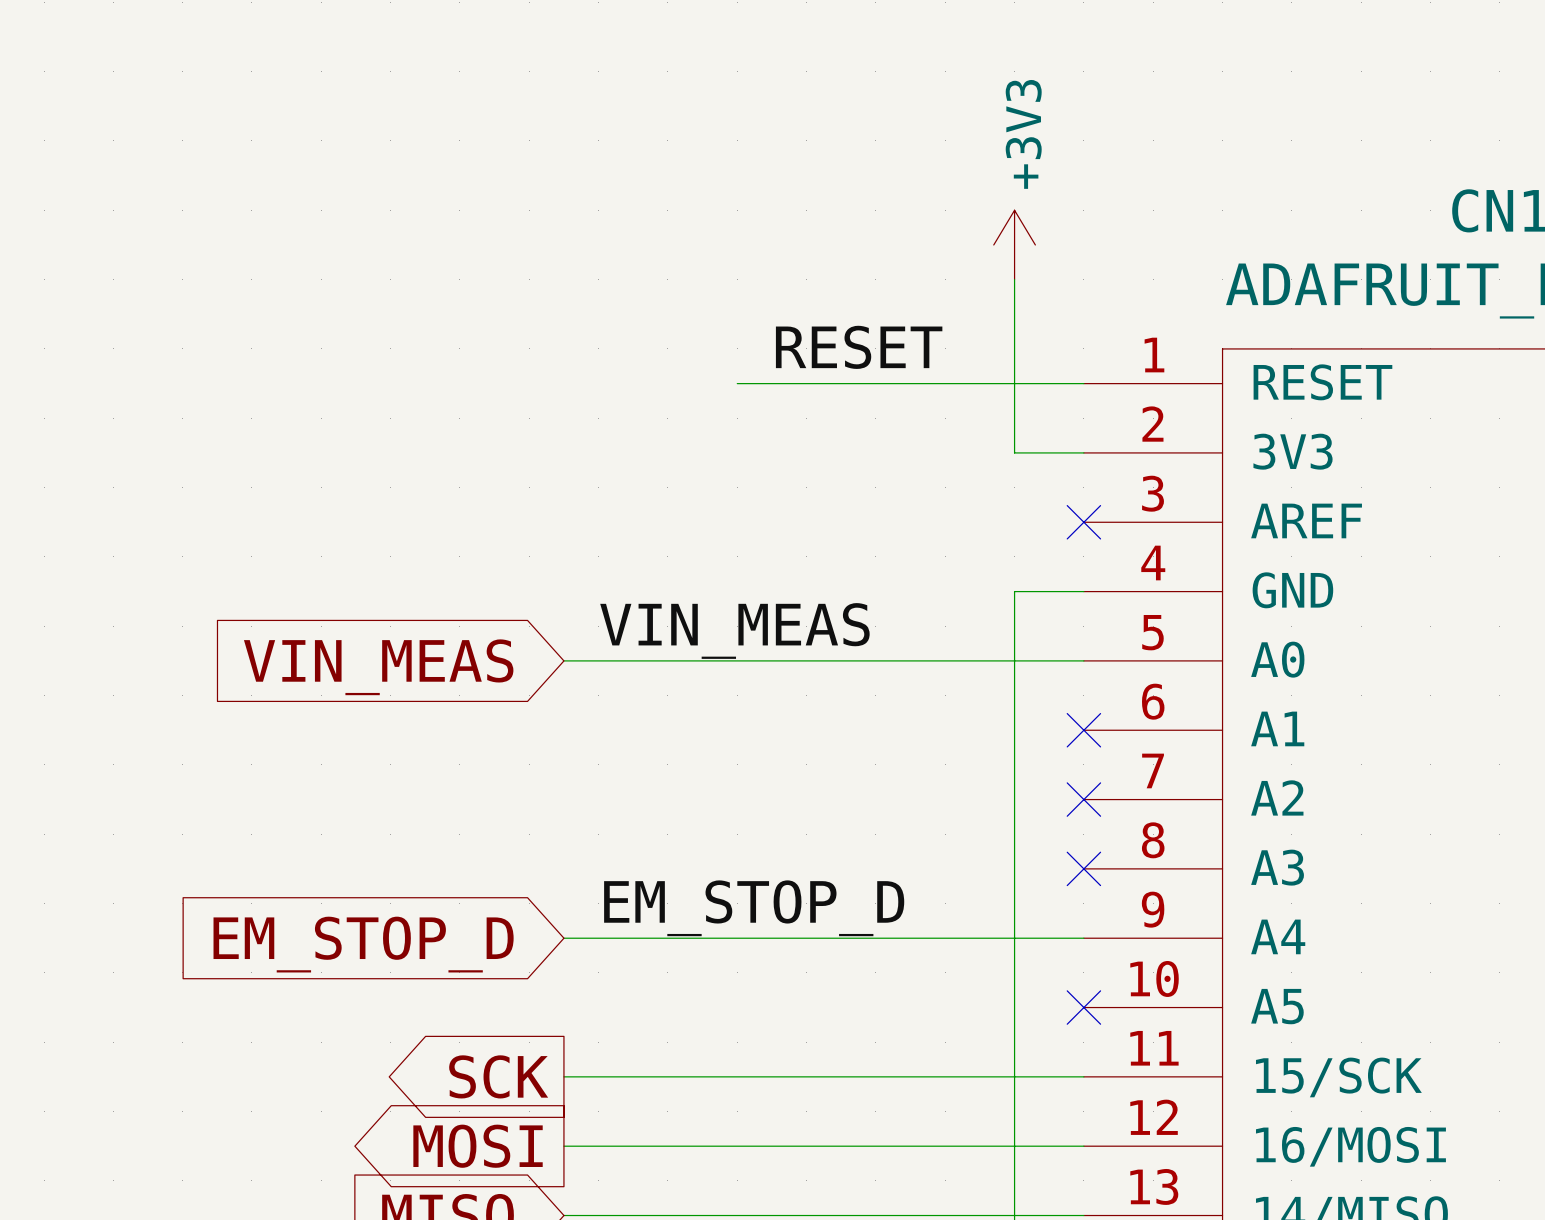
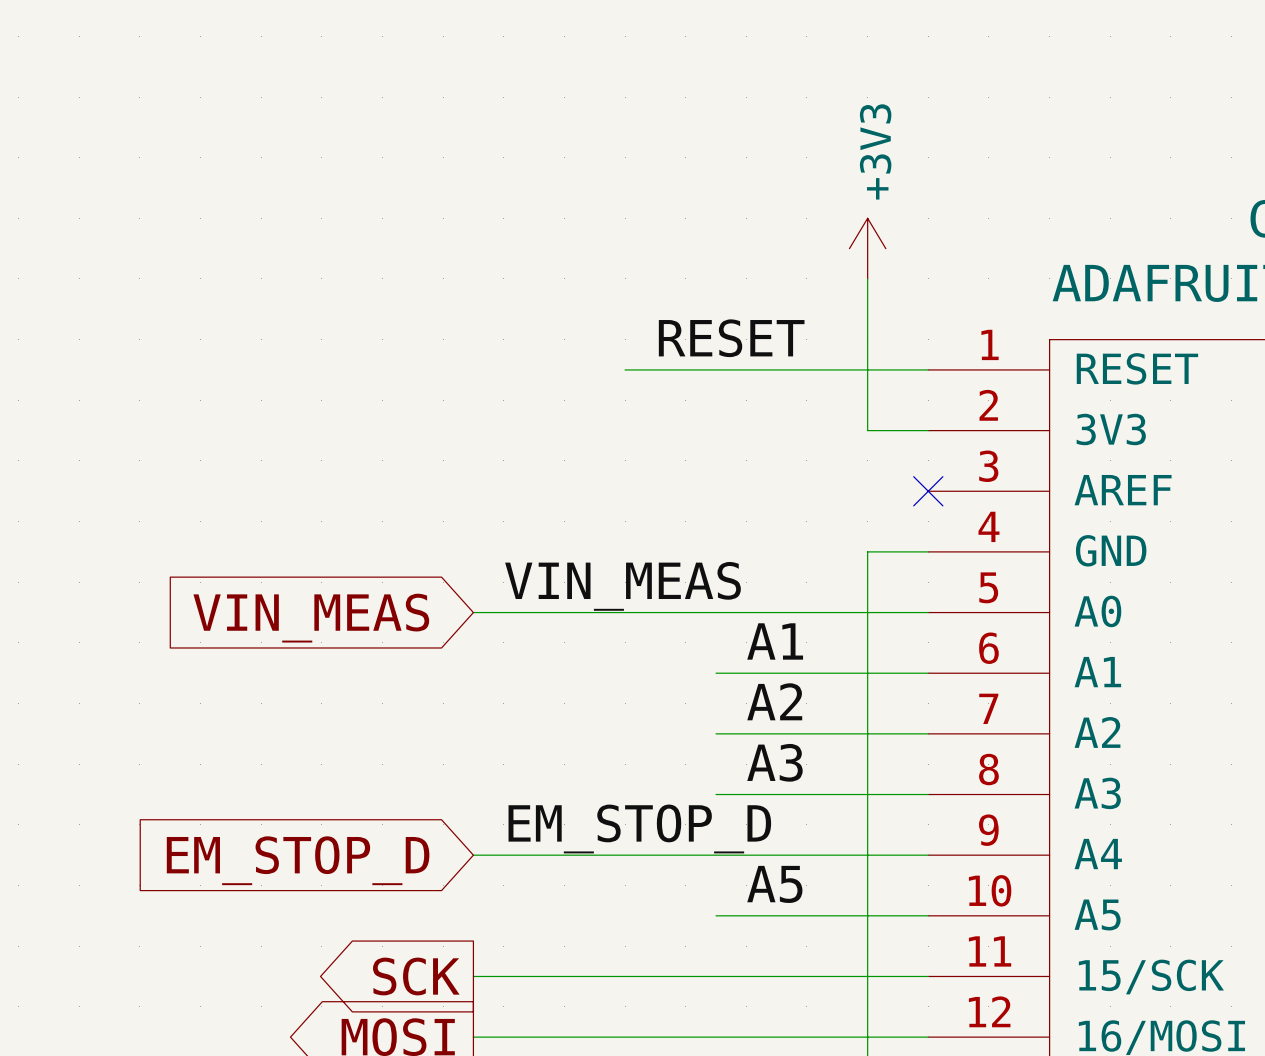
label: none -> A1 (775, 641)
wire: none -> (716, 673) (928, 673)
no-connect mark: (1083, 730) -> none
label: none -> A2 (774, 701)
wire: none -> (716, 733) (928, 733)
no-connect mark: (1083, 799) -> none
label: none -> A3 (774, 762)
wire: none -> (716, 794) (928, 794)
no-connect mark: (1083, 868) -> none
label: none -> A5 (774, 884)
wire: none -> (716, 915) (928, 915)
no-connect mark: (1083, 1007) -> none

